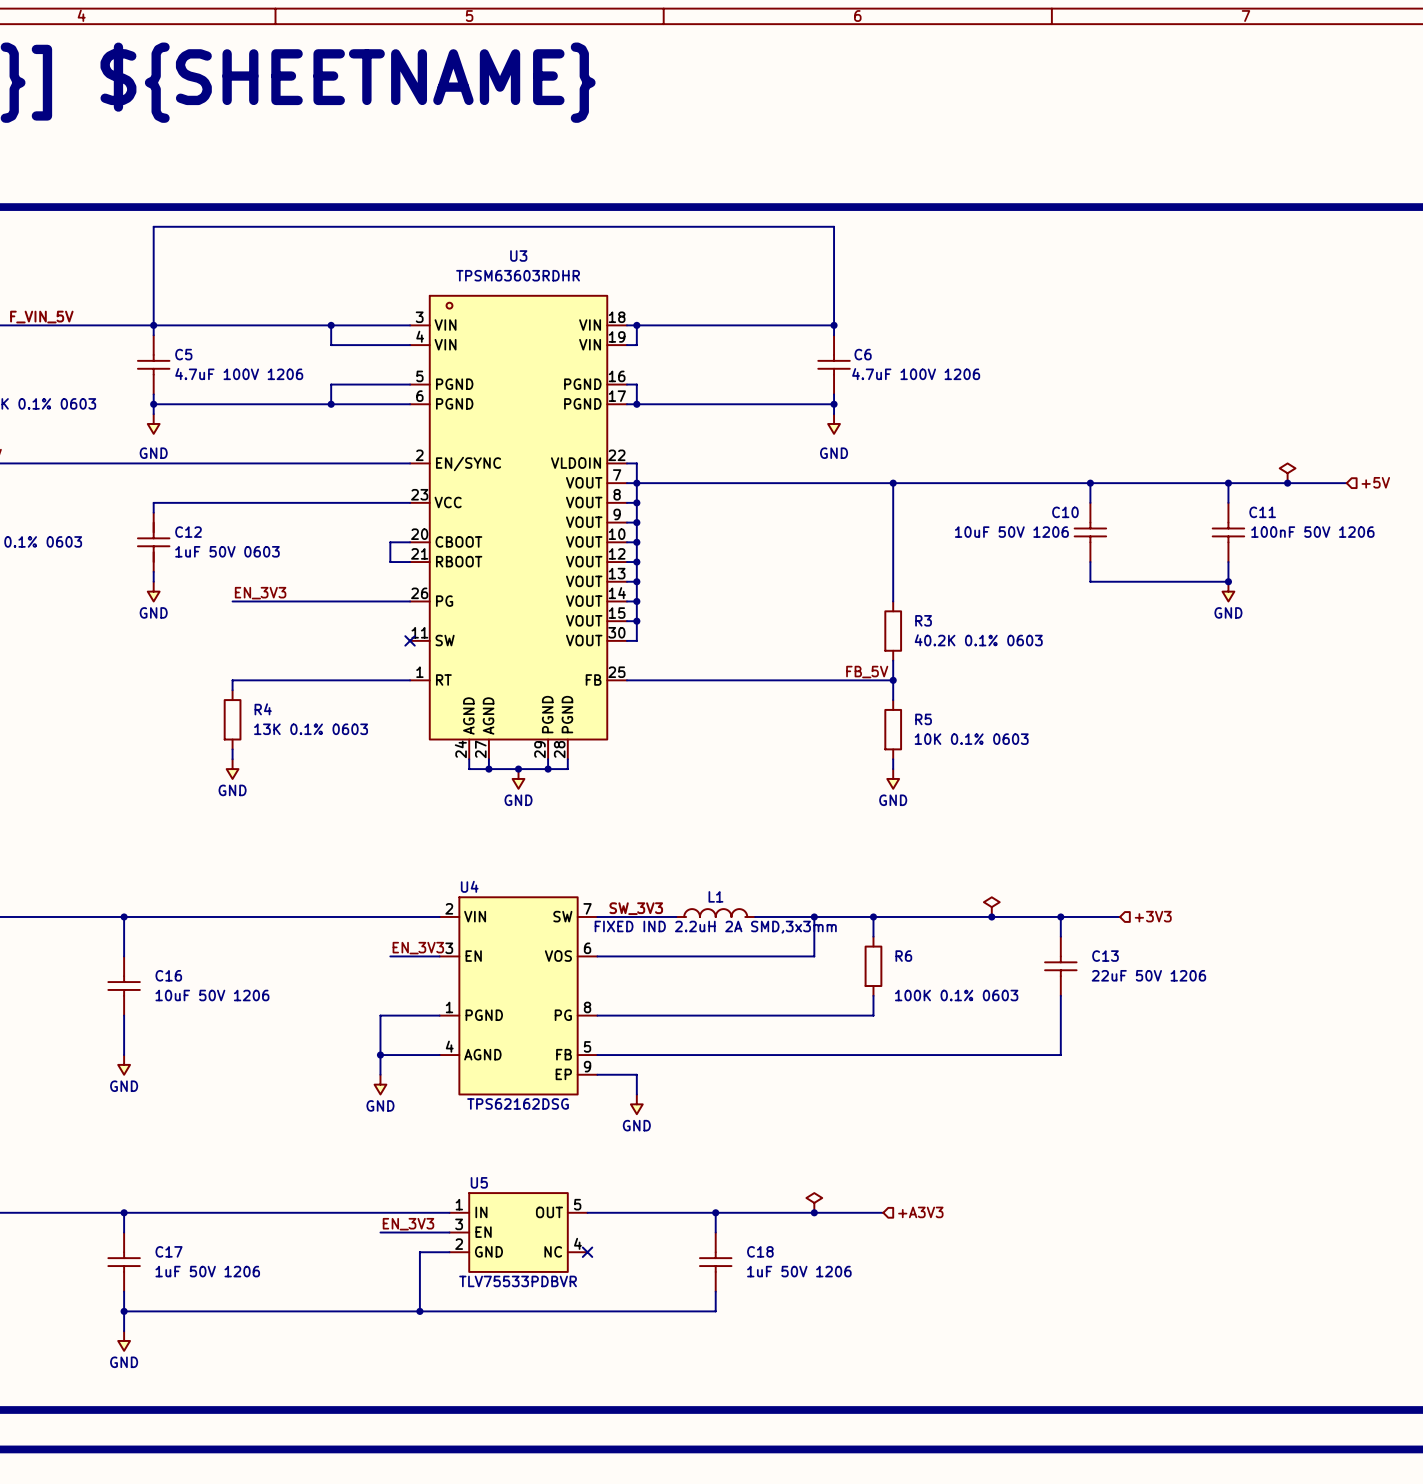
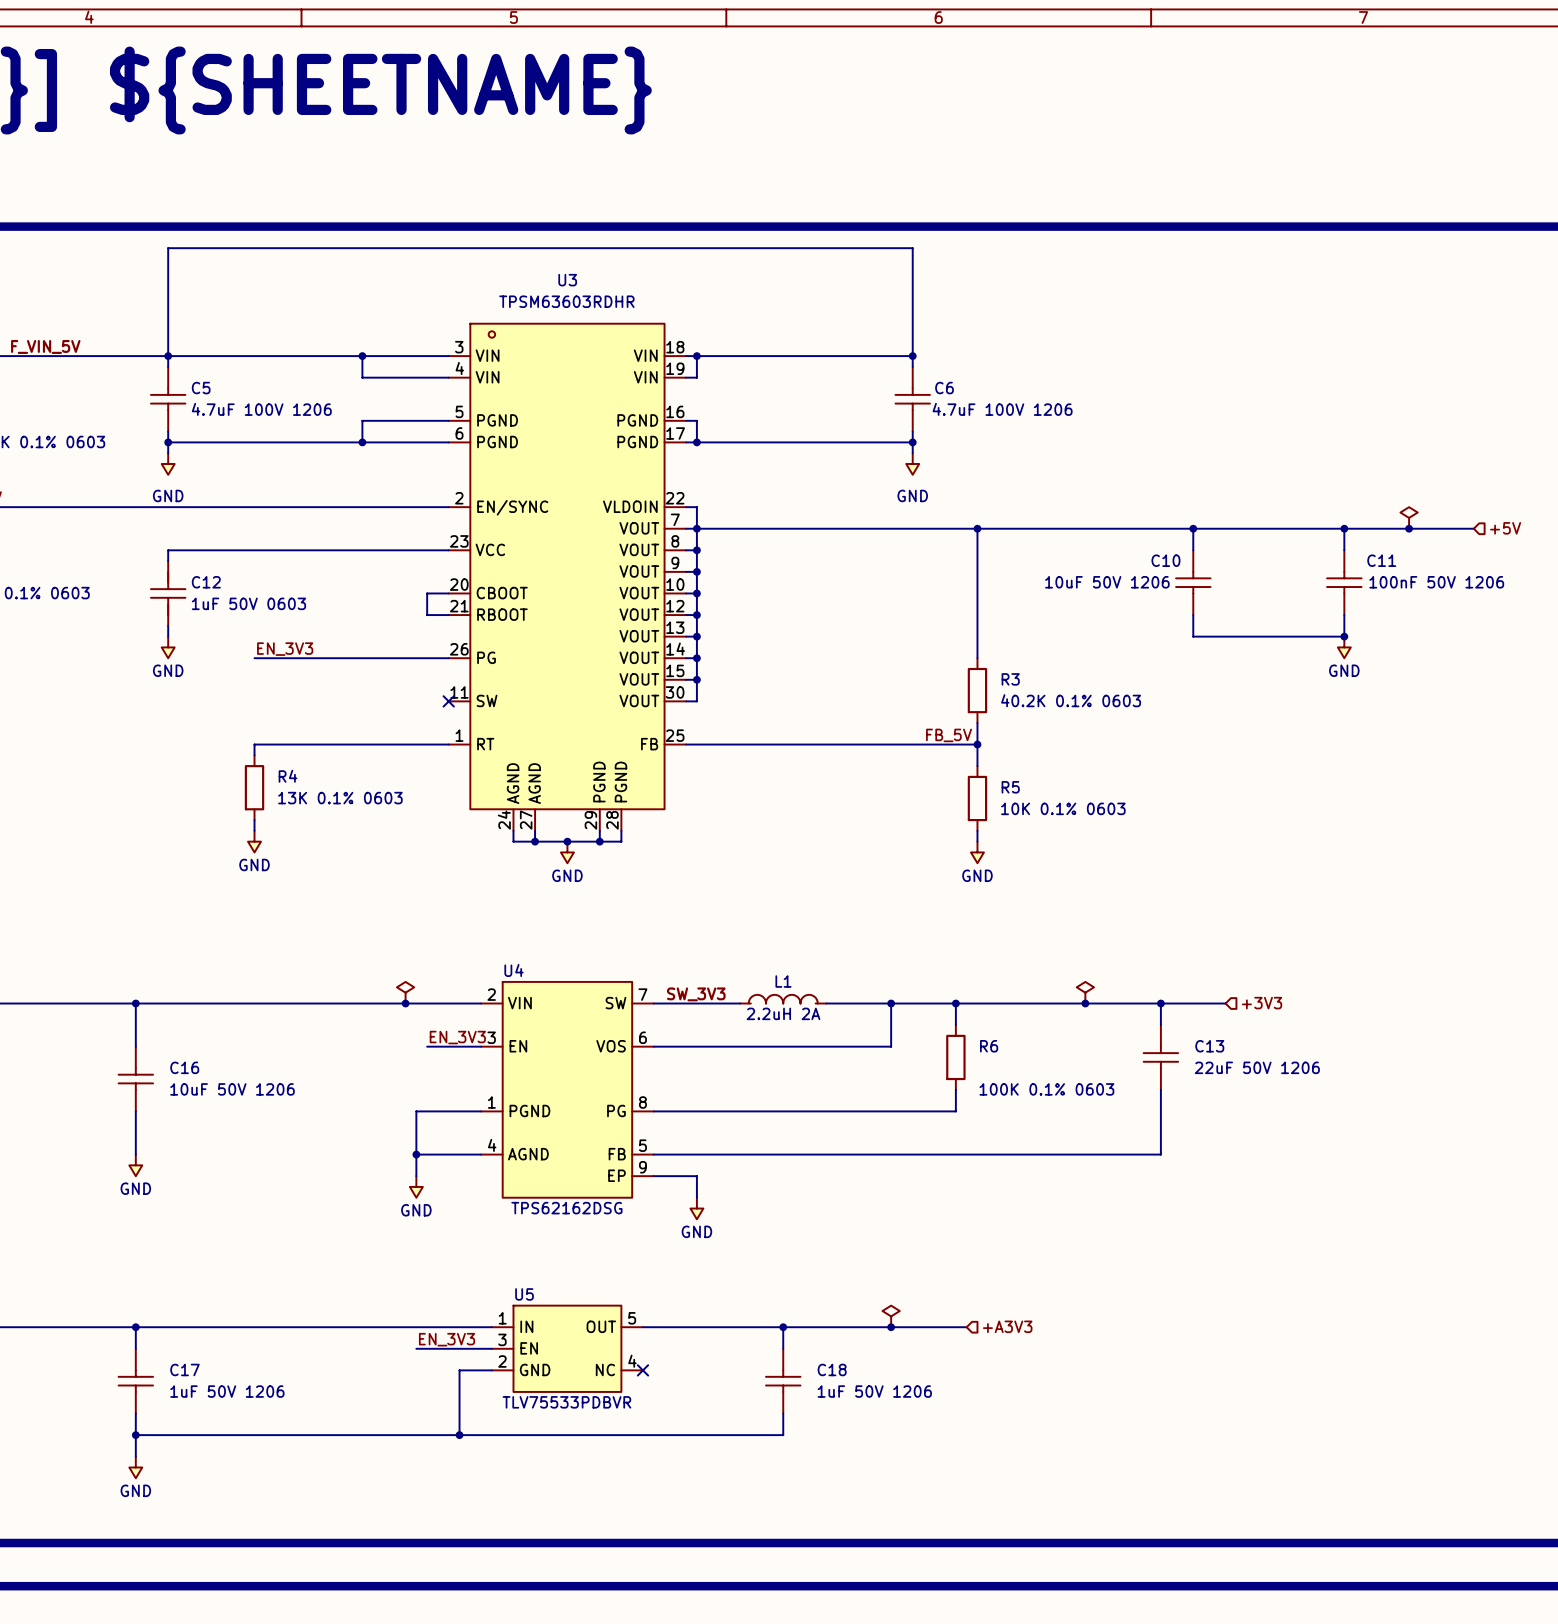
power symbol: none -> (405, 992)
junction: none -> (405, 1003)
L1 text: FIXED IND 2.2uH 2A SMD,3x3mm (715, 927) -> 2.2uH 2A (783, 1013)

